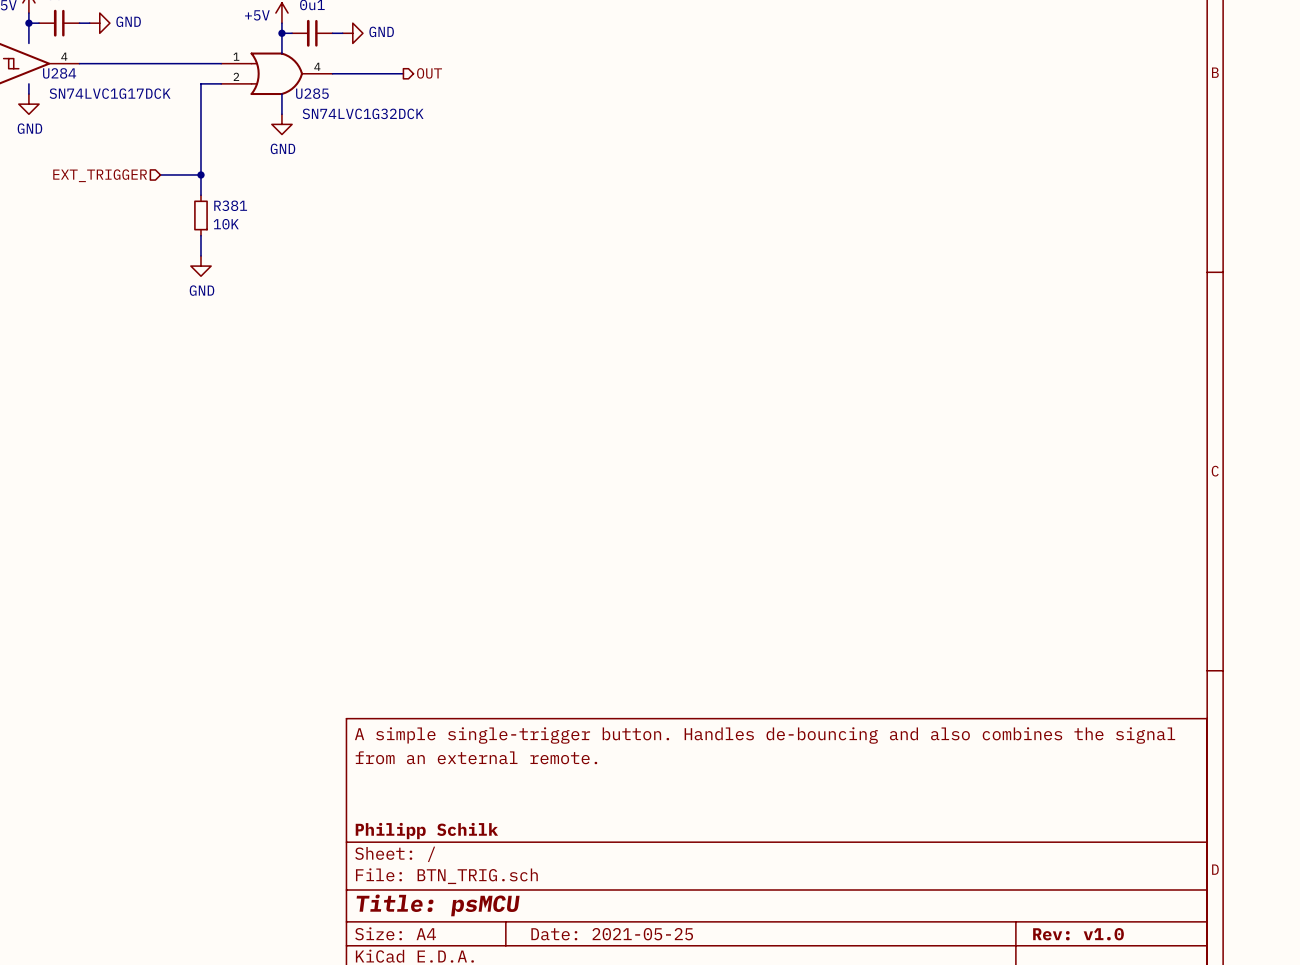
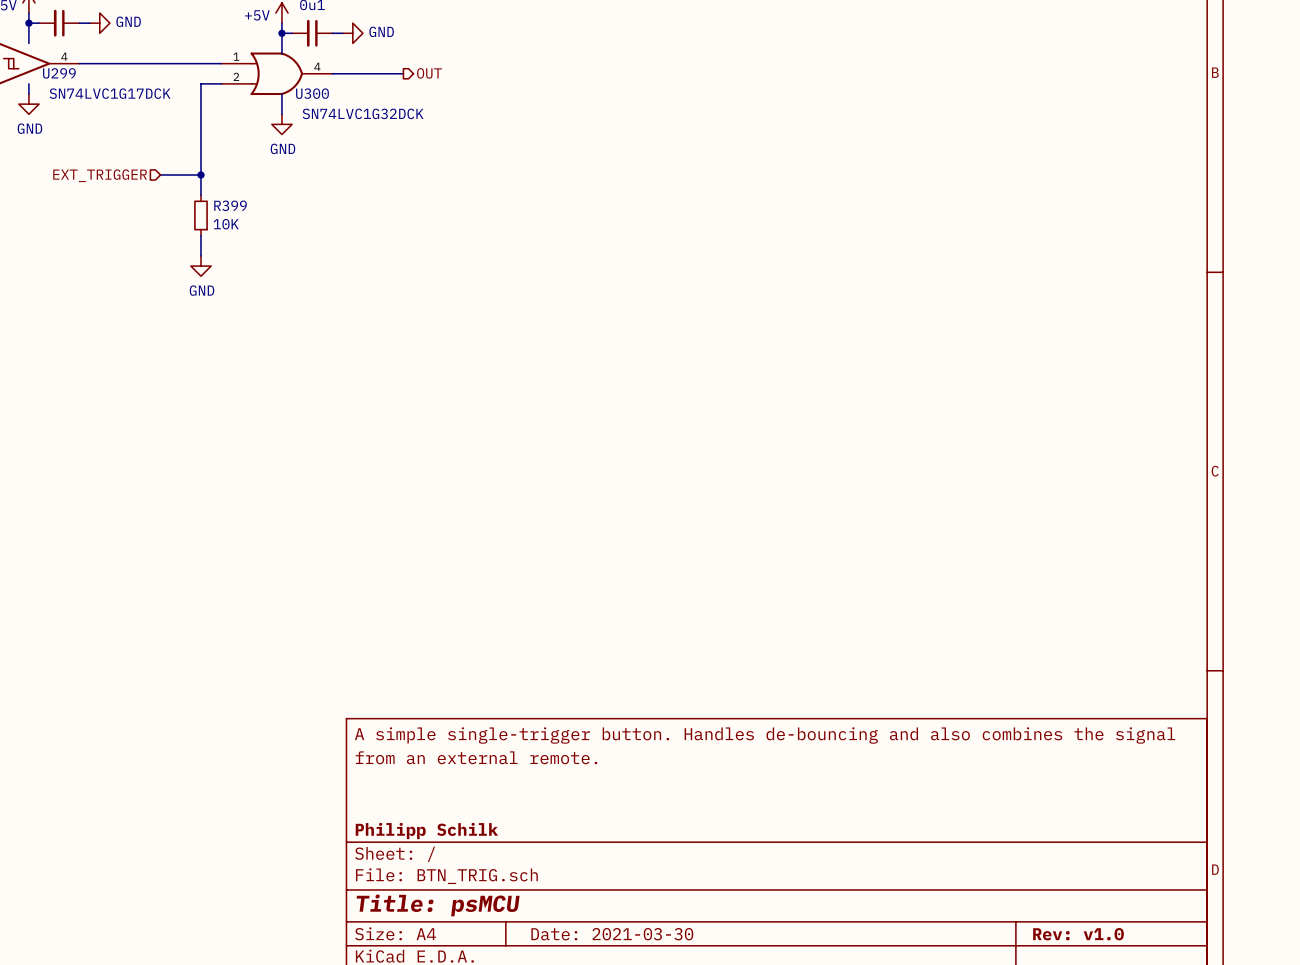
U284 name: U284 (59, 73) -> U299 (59, 73)
U285 name: U285 (312, 93) -> U300 (312, 93)
R381 name: R381 (230, 205) -> R399 (230, 205)
title block: Date: 2021-05-25 (612, 934) -> Date: 2021-03-30 (612, 934)

